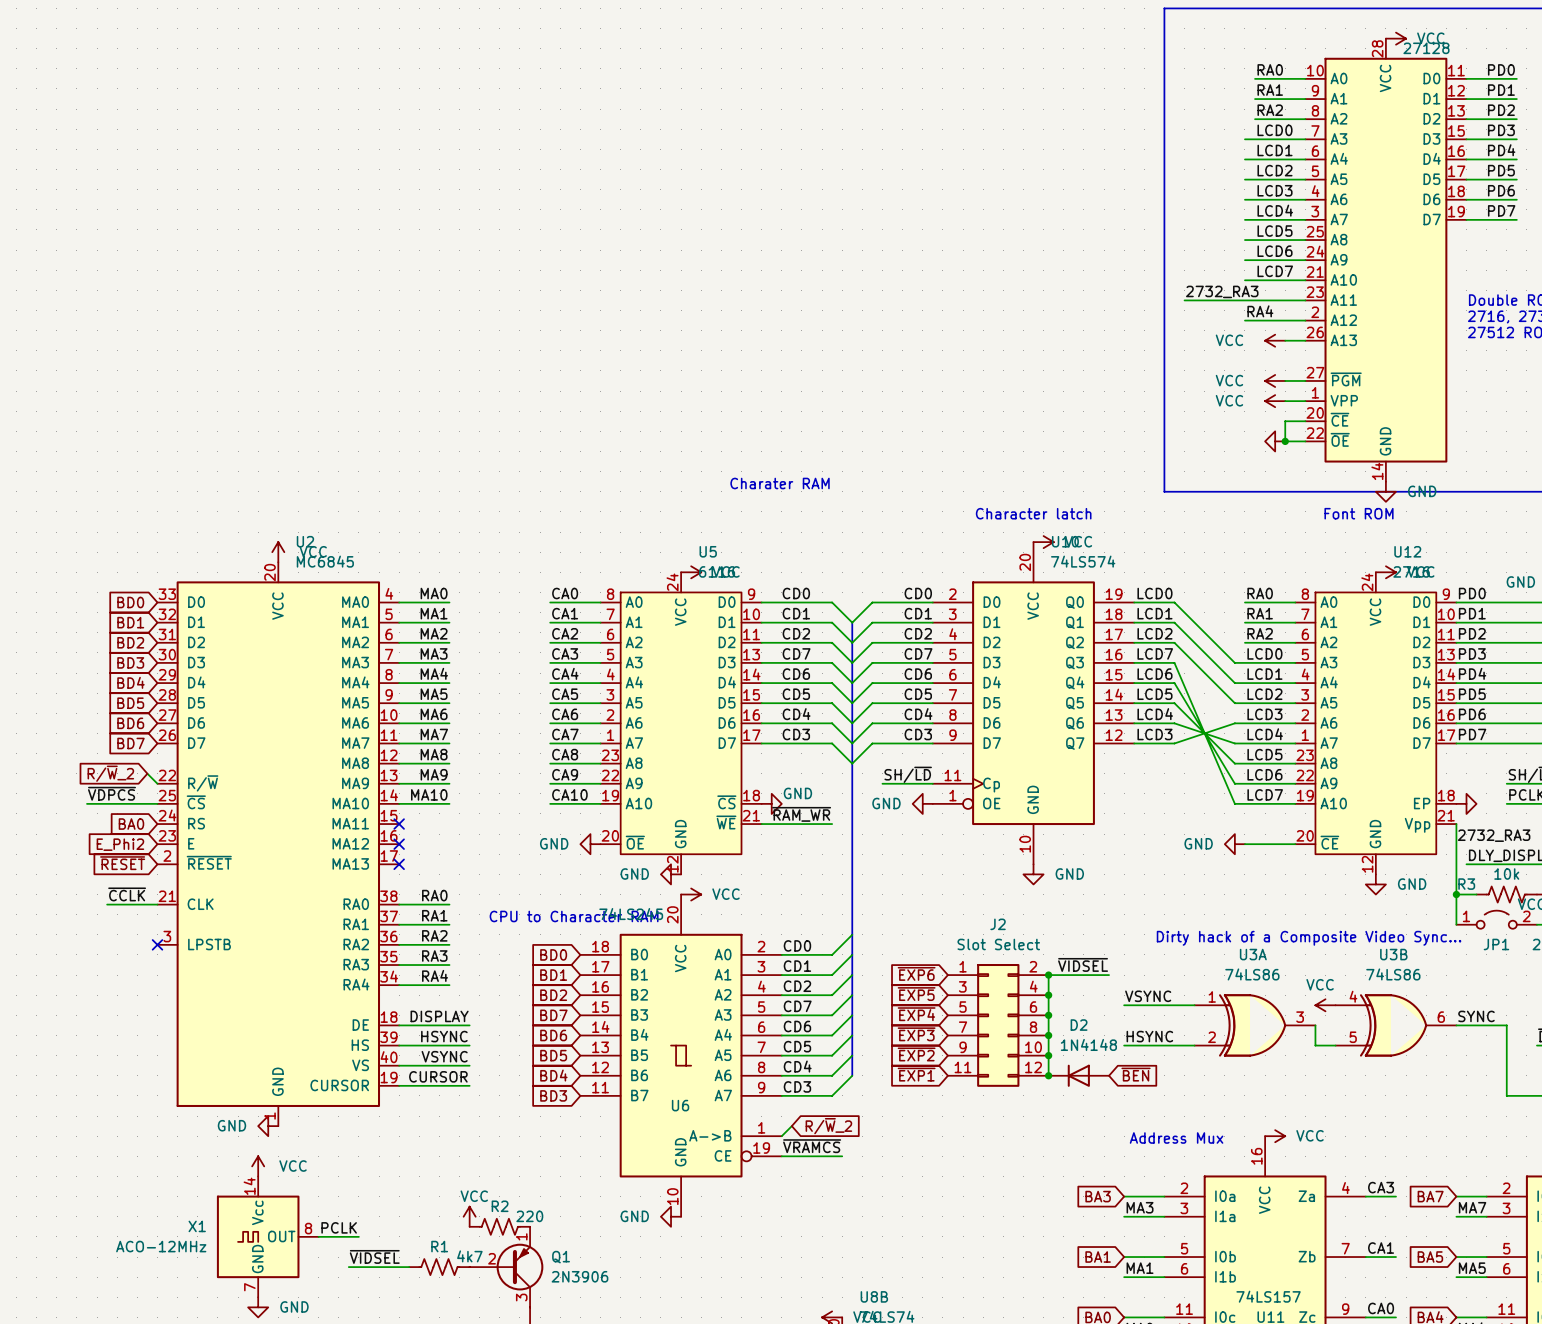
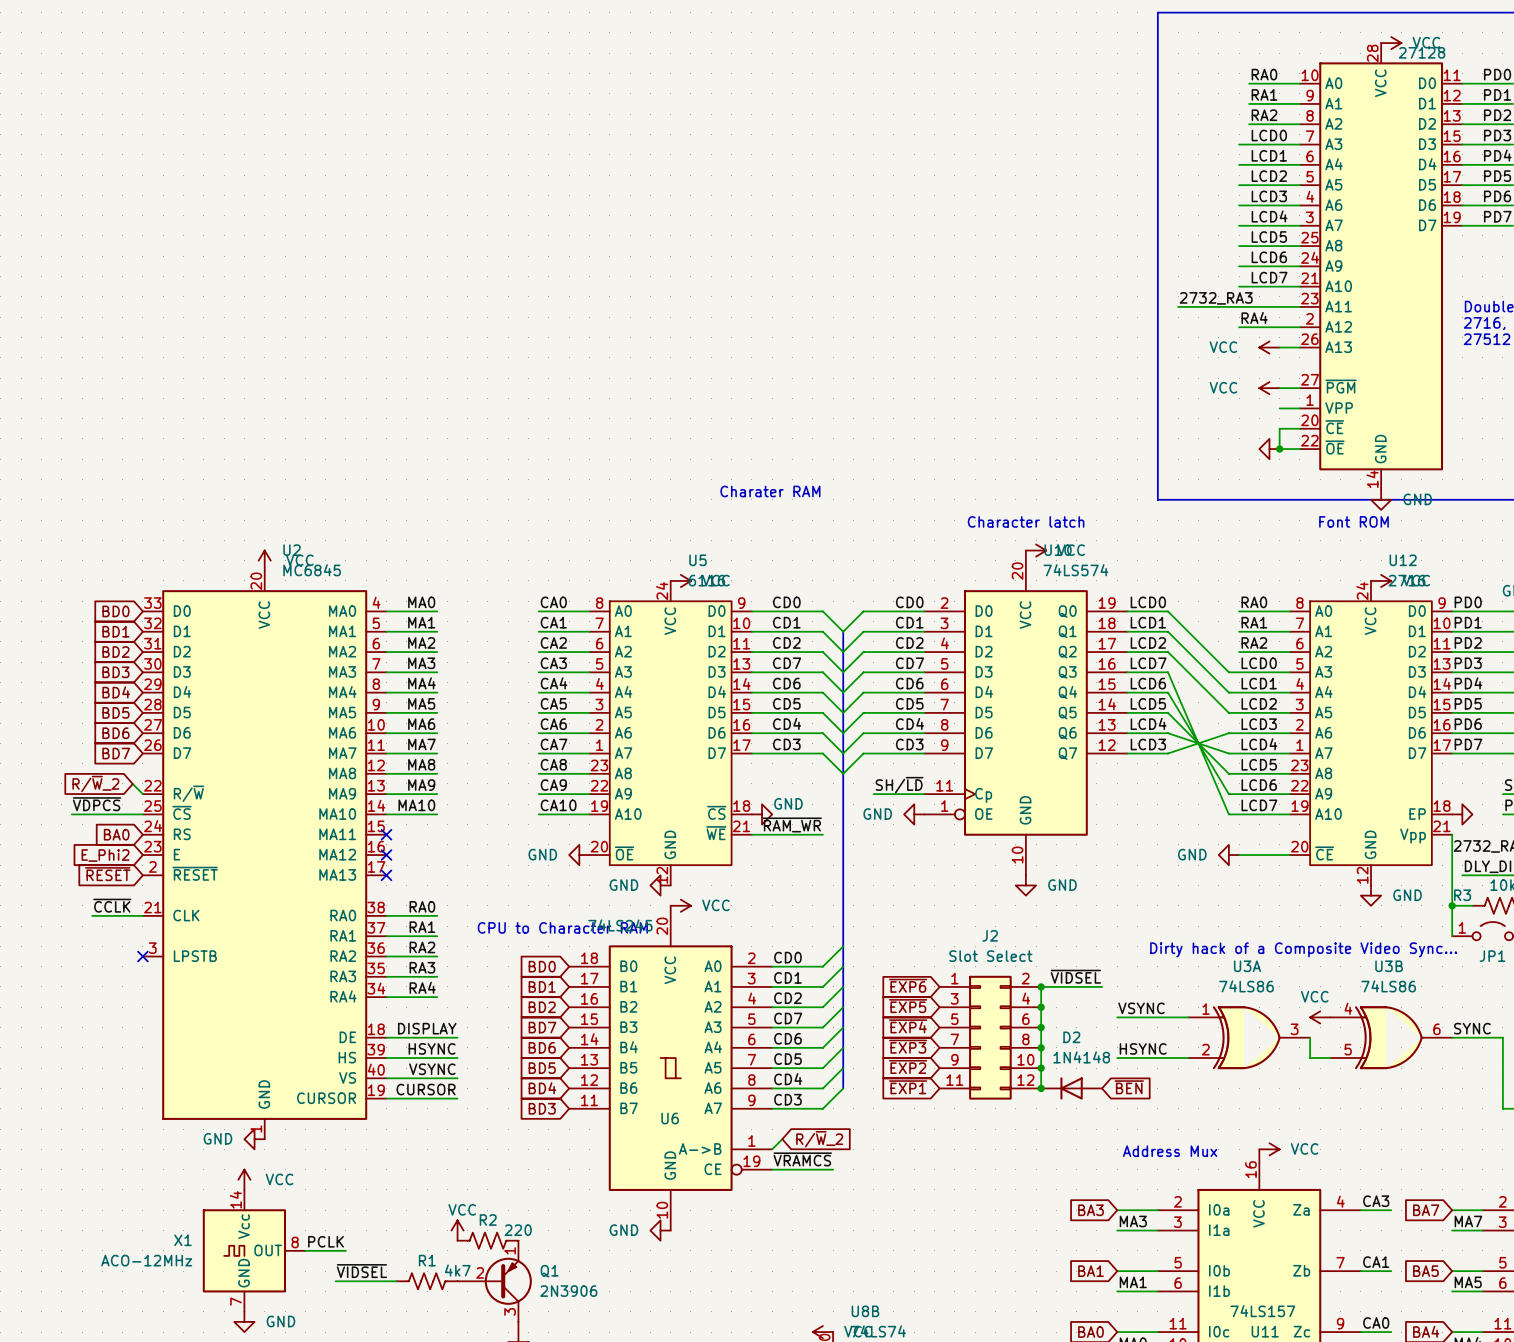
power symbol: VCC (1275, 401) -> none

